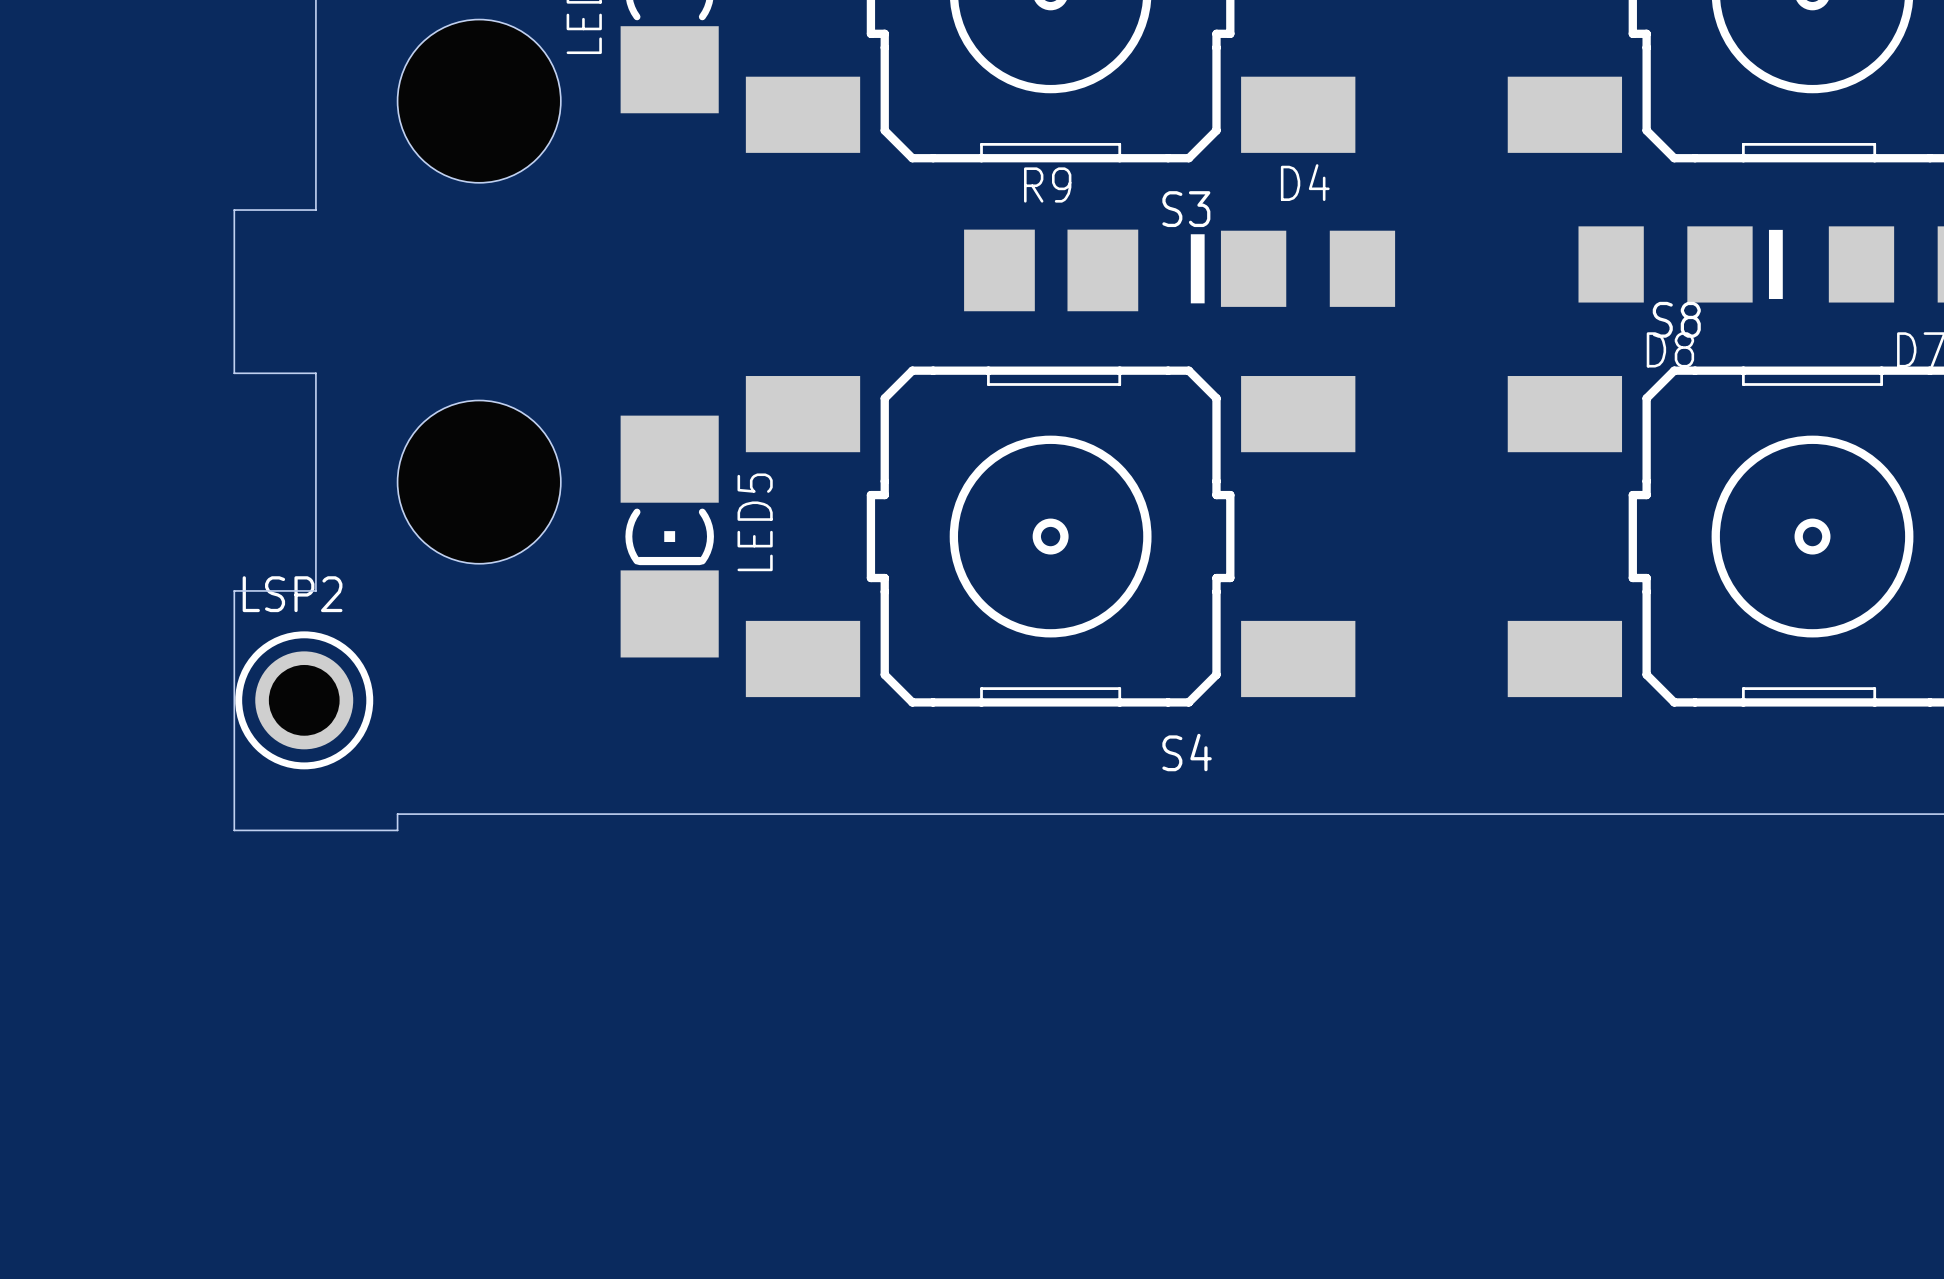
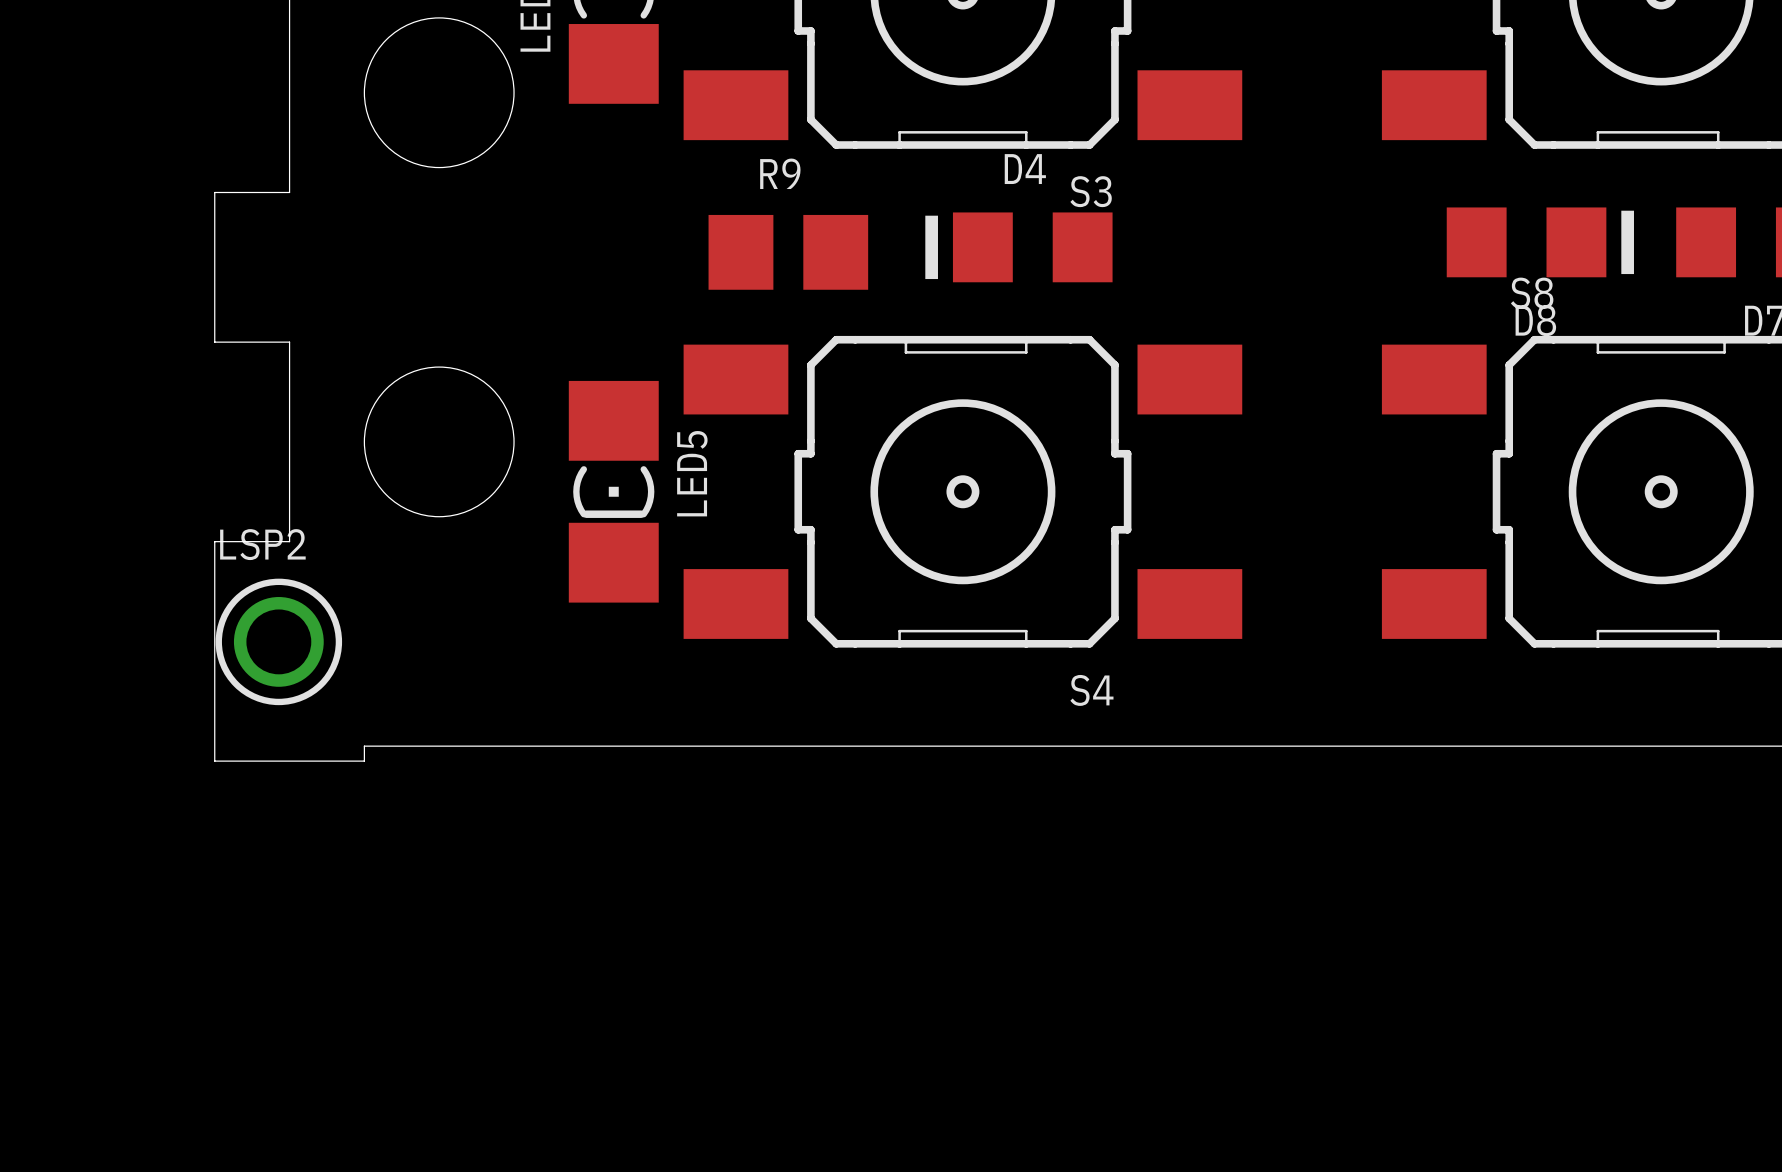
D4 position: (1292, 268) -> (1018, 247)
R9 position: (1051, 270) -> (788, 252)

